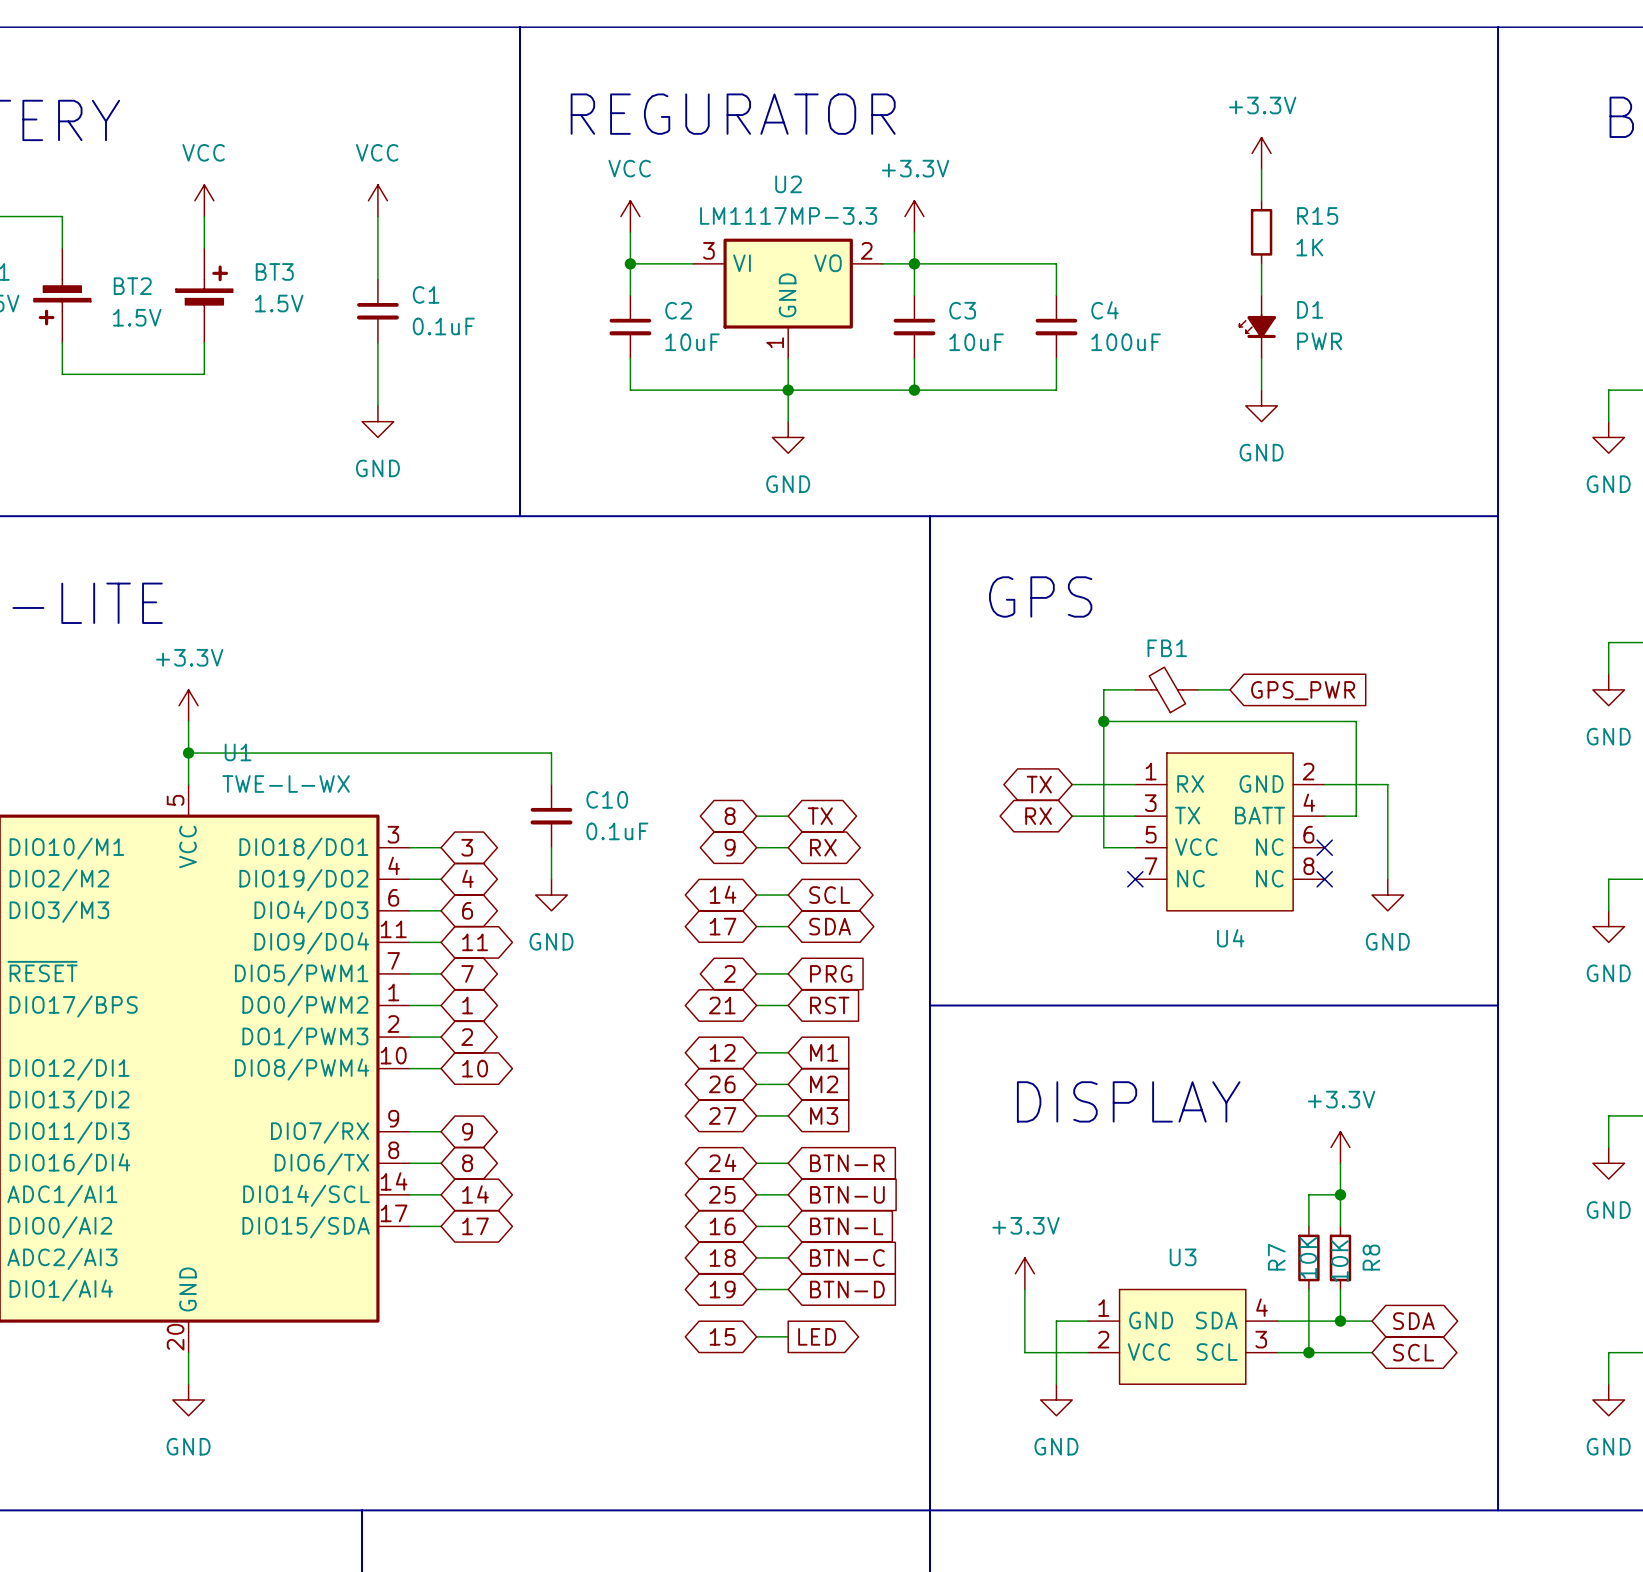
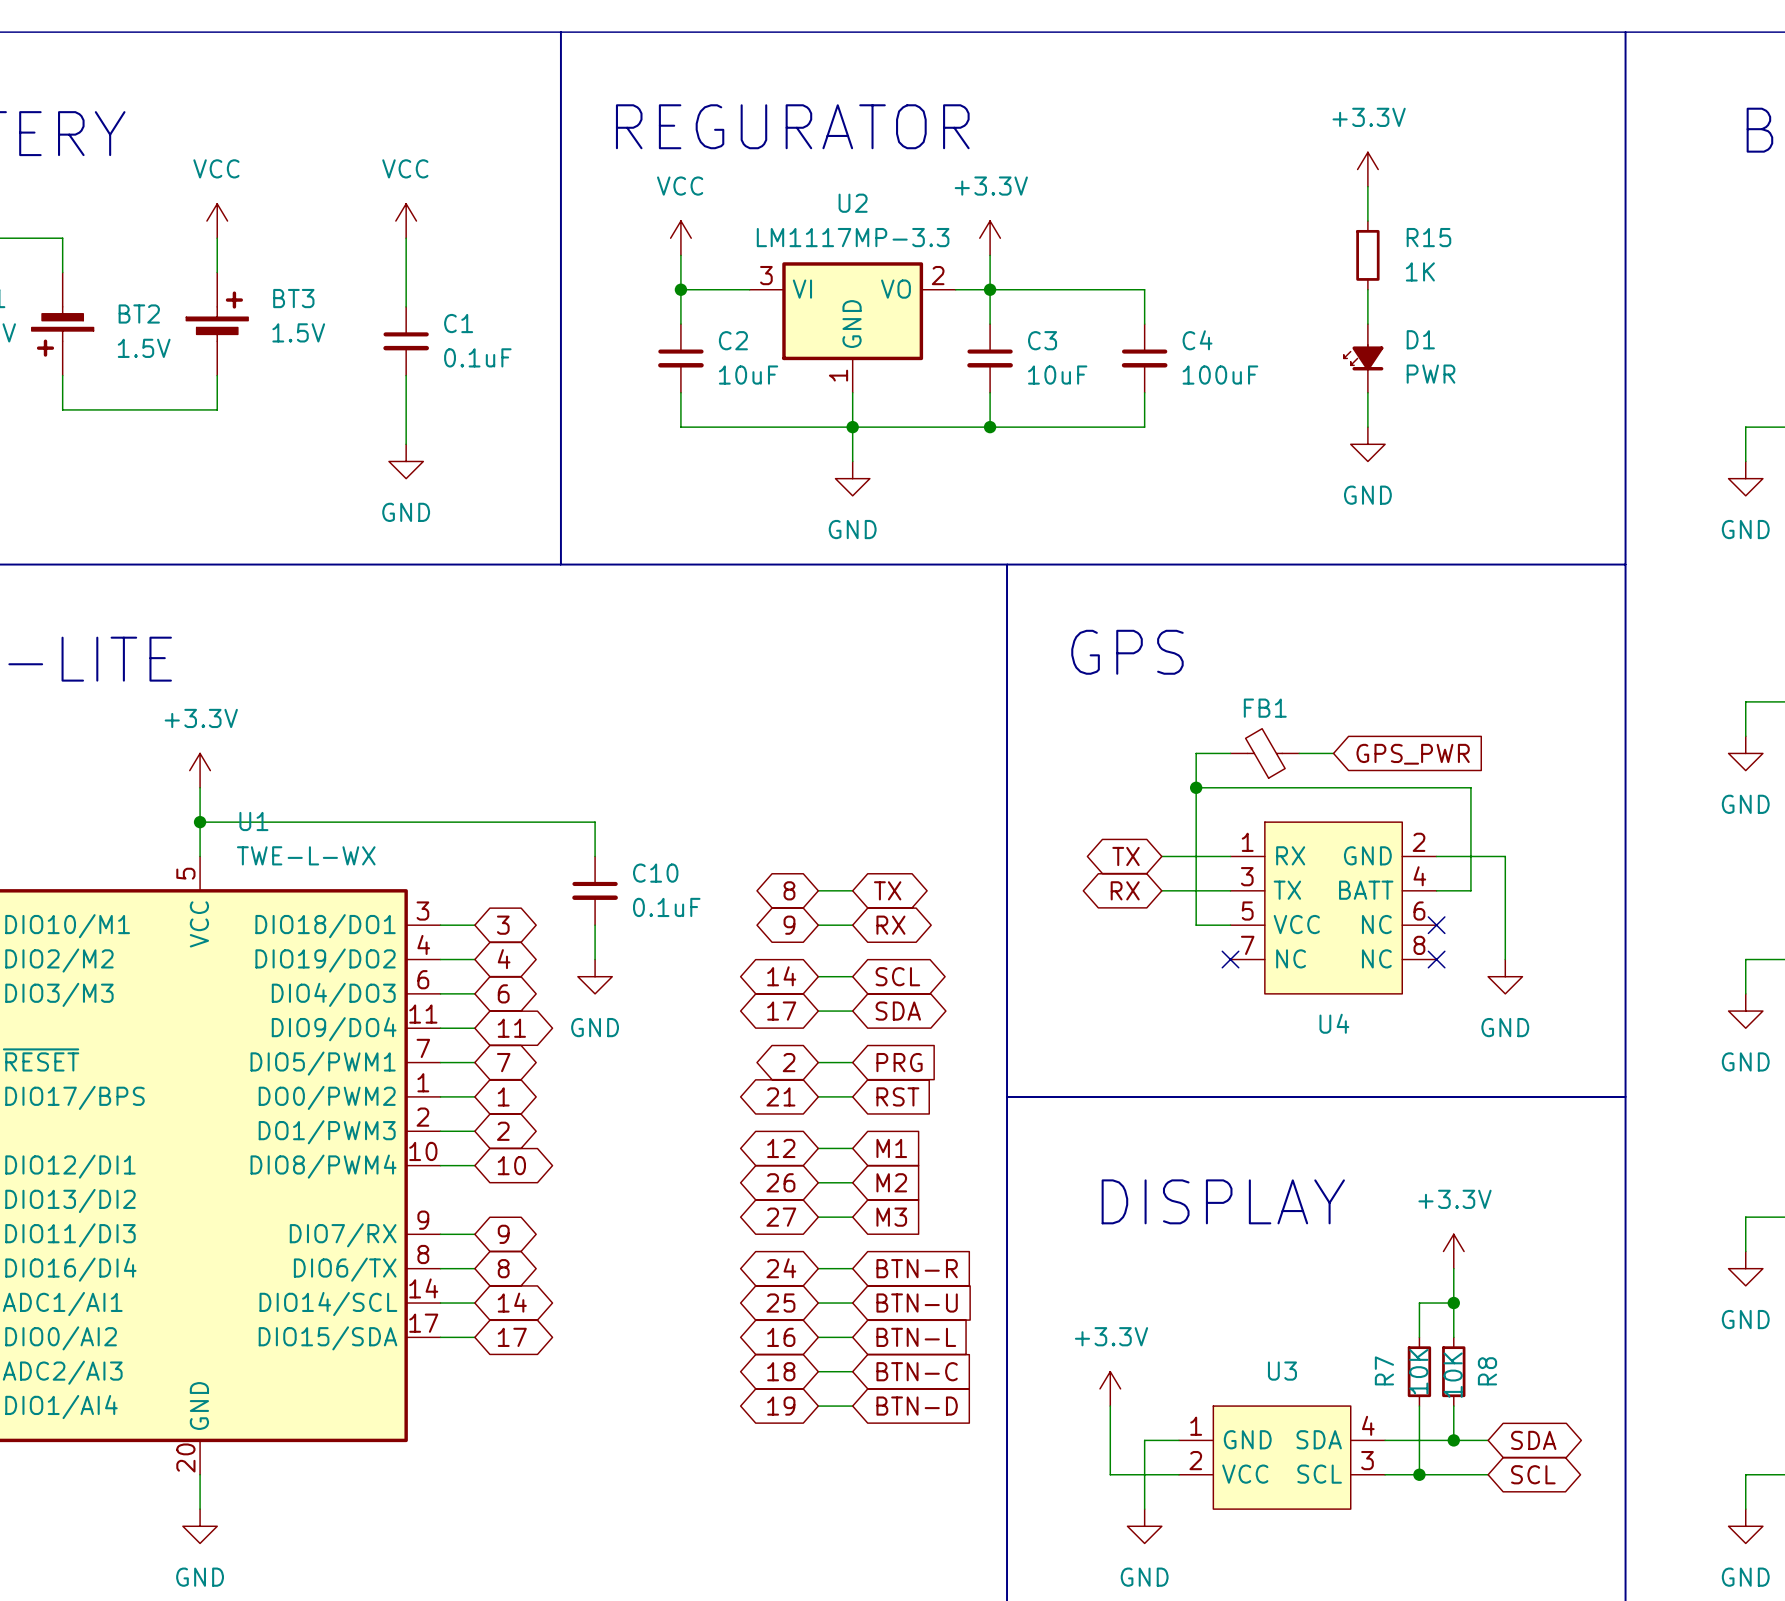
global label: 15 (722, 1336) -> none
wire: (756, 1336) (788, 1336) -> none
global label: LED (817, 1336) -> none

